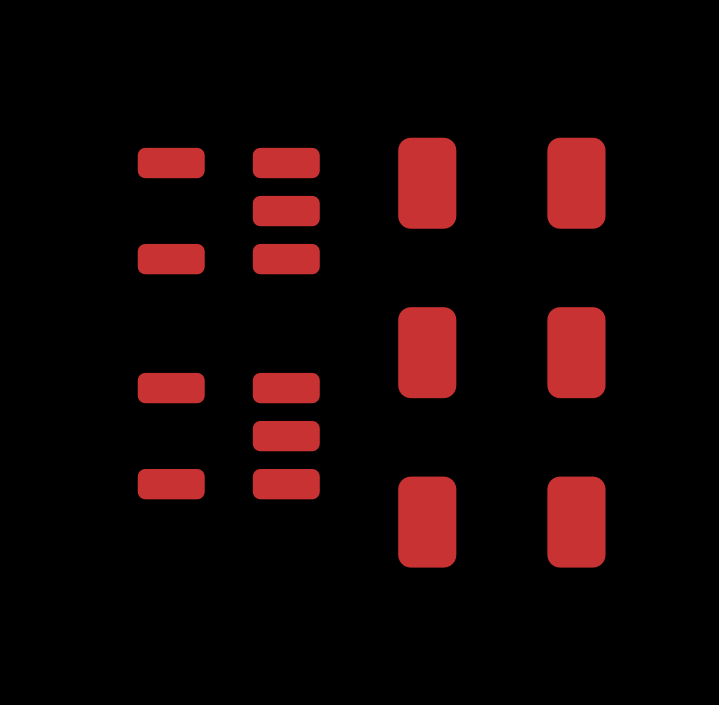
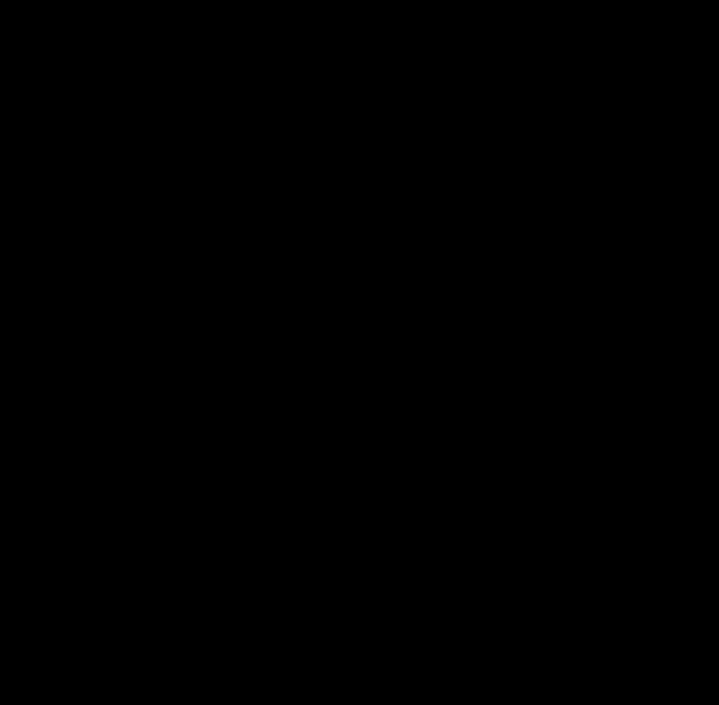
part: (501, 183) -> none
part: (228, 211) -> none
part: (501, 352) -> none
part: (228, 436) -> none
part: (501, 522) -> none

